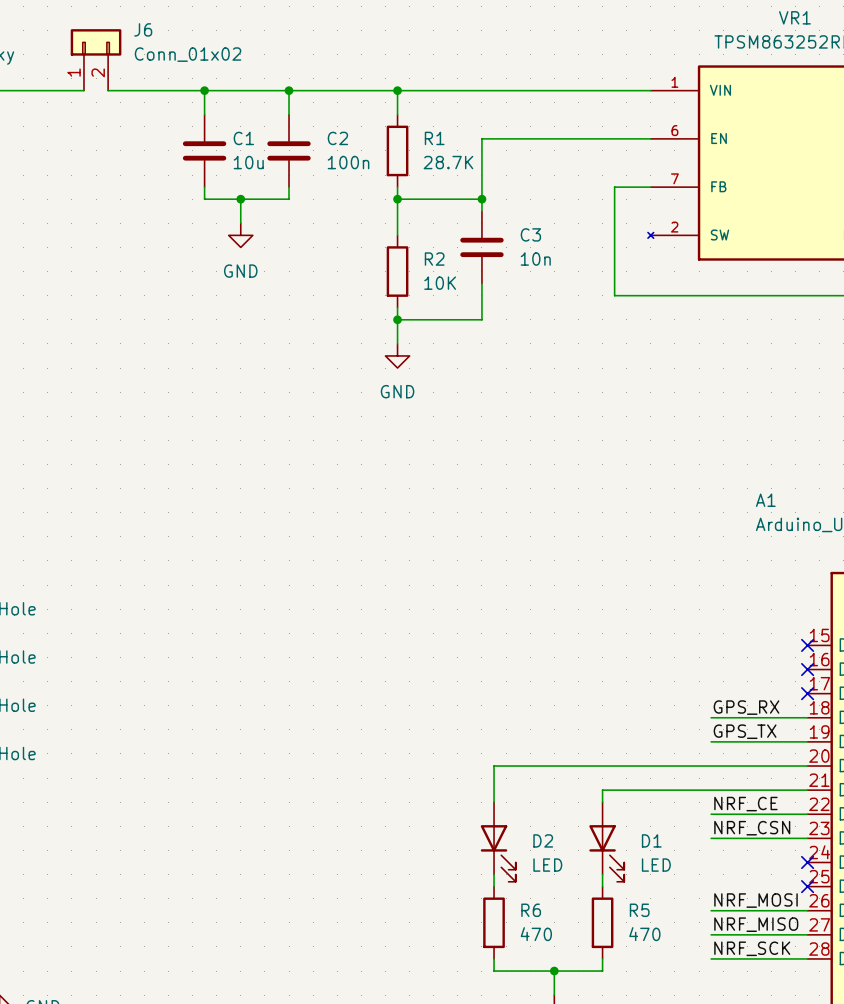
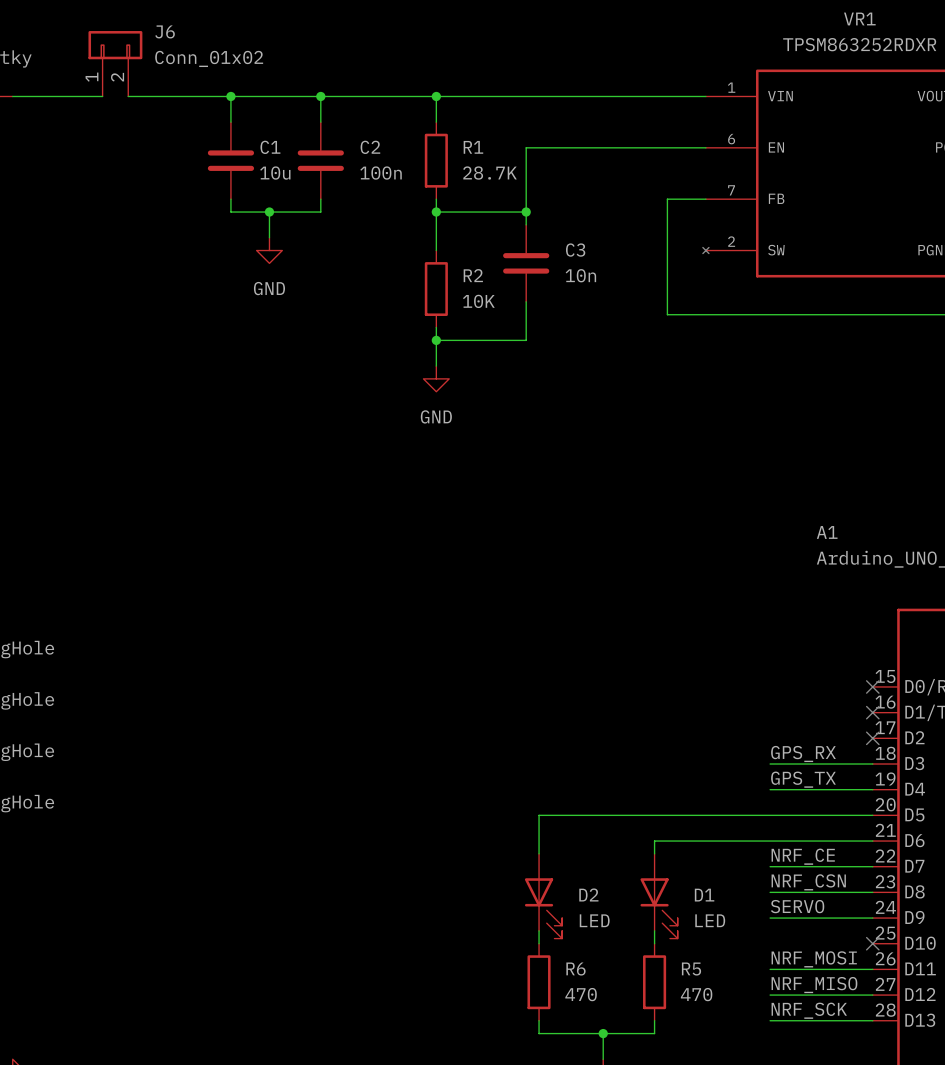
label: none -> SERVO (797, 906)
wire: none -> (770, 918) (872, 918)
no-connect mark: (807, 862) -> none

